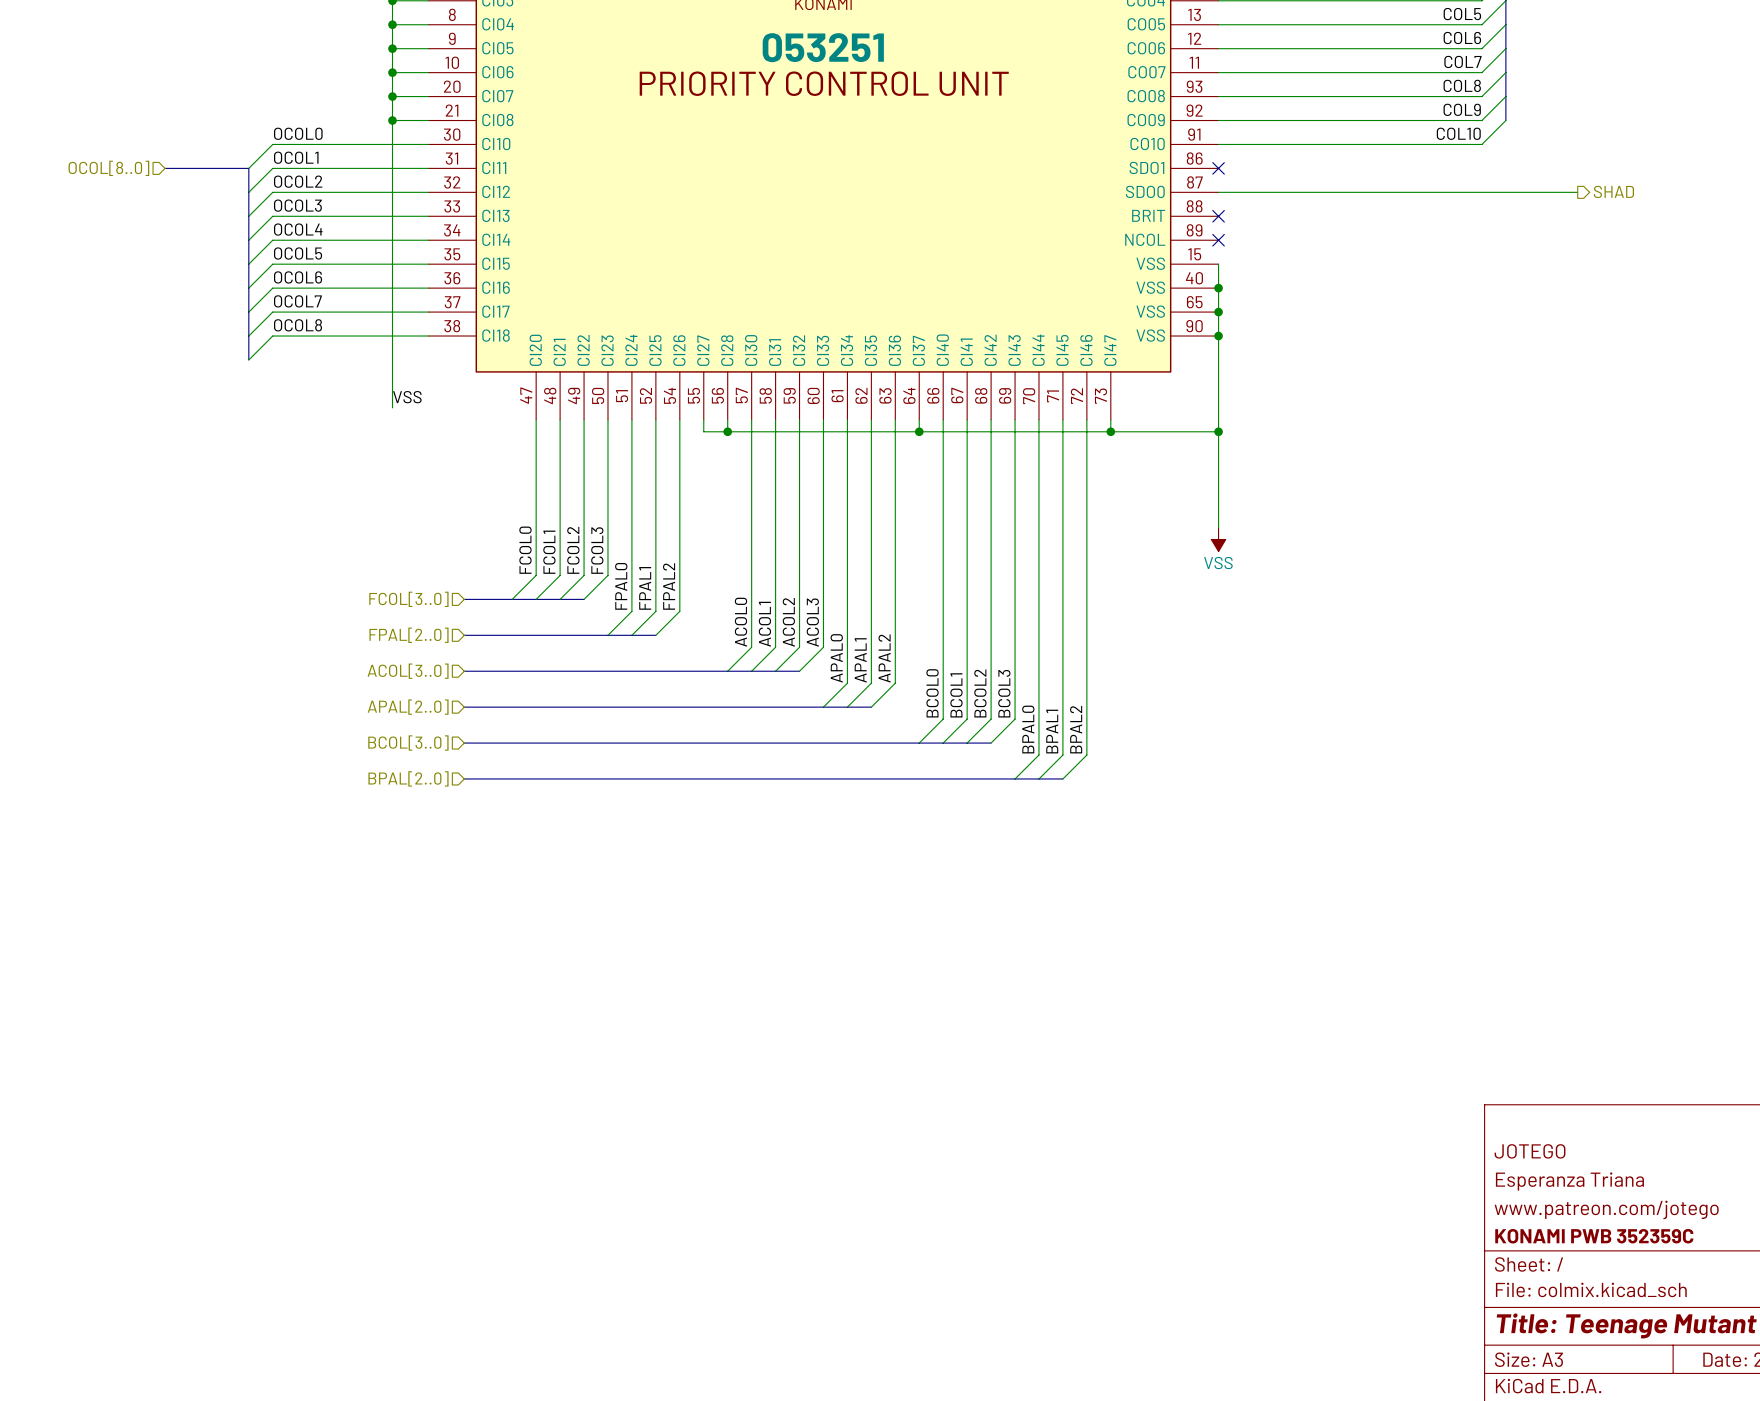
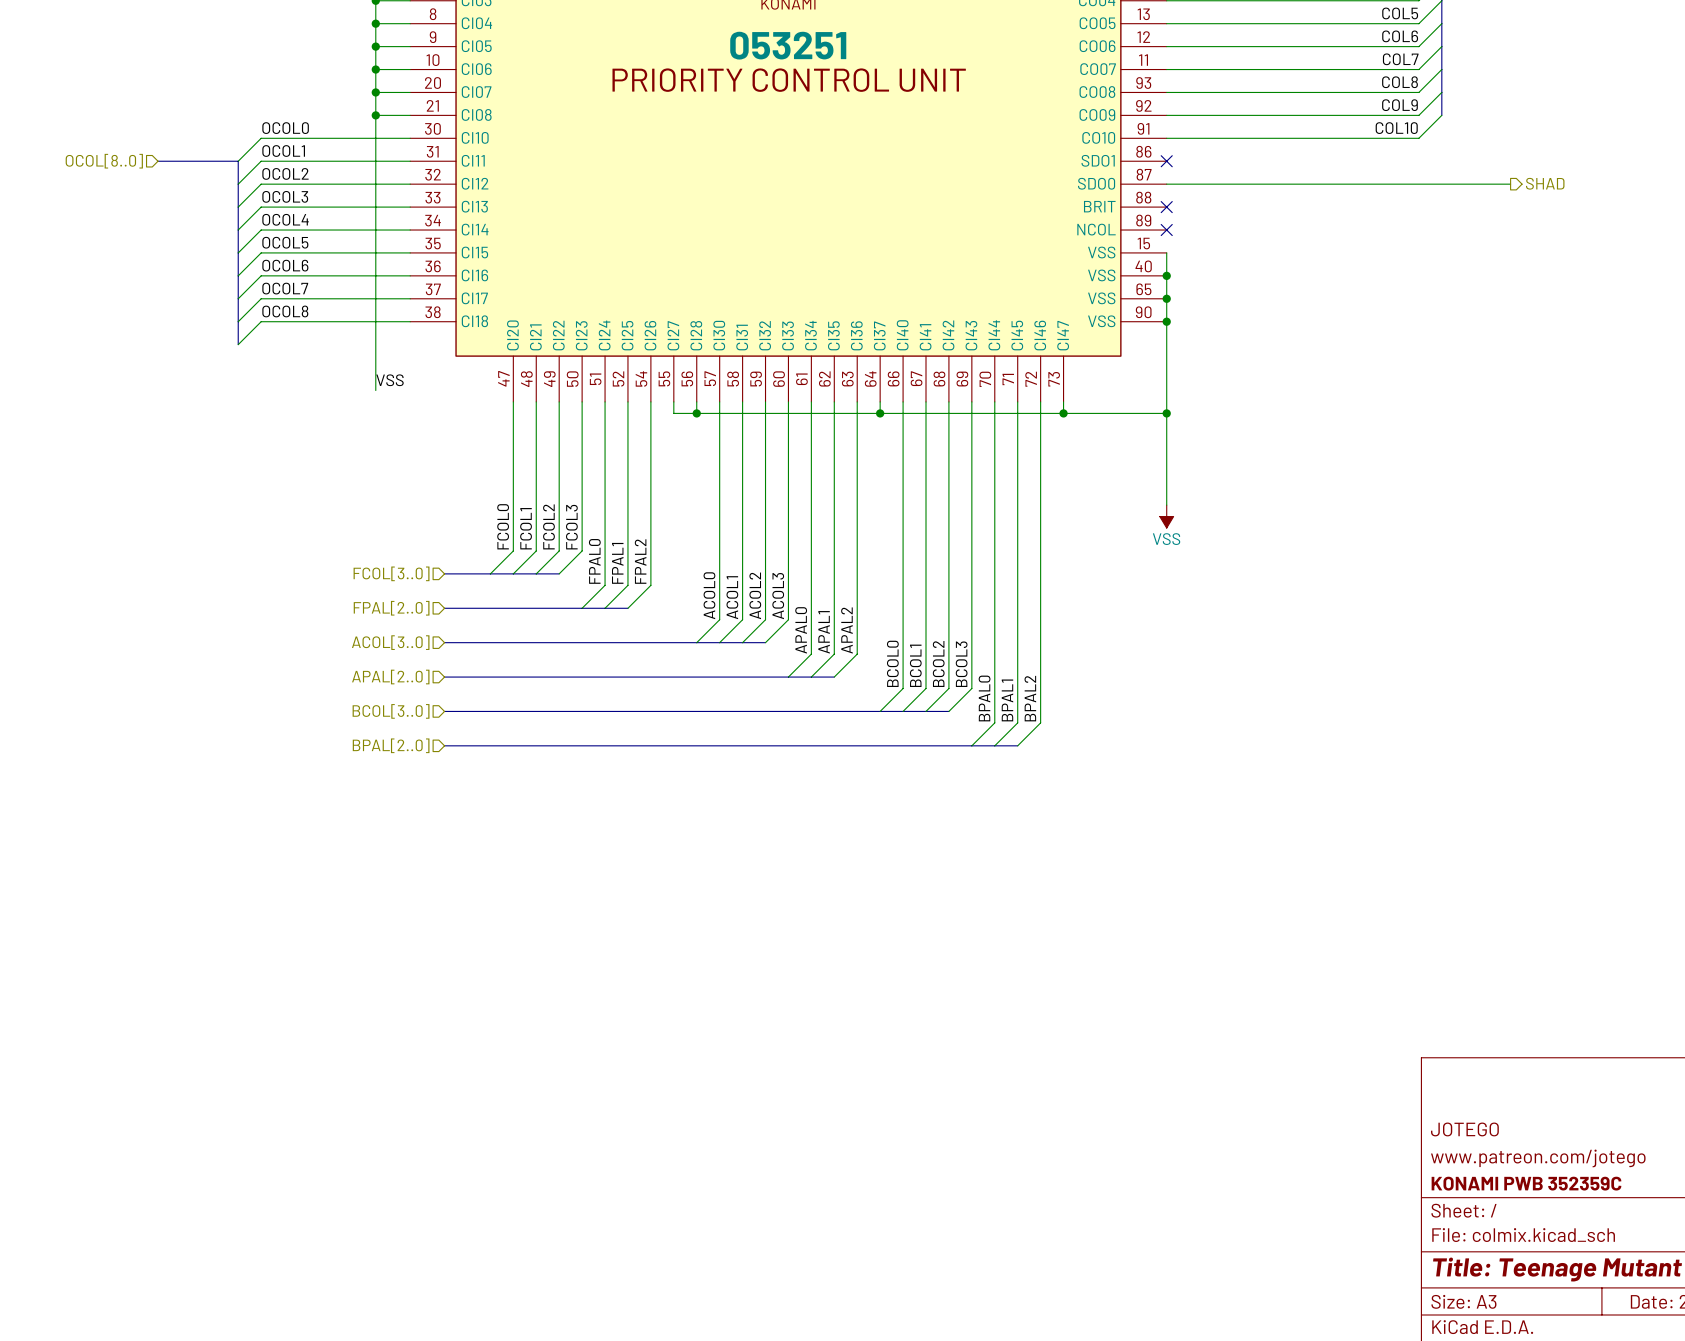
title block: JOTEGO (1530, 1151) -> none
title block: Esperanza Triana (1569, 1181) -> JOTEGO (1464, 1129)

